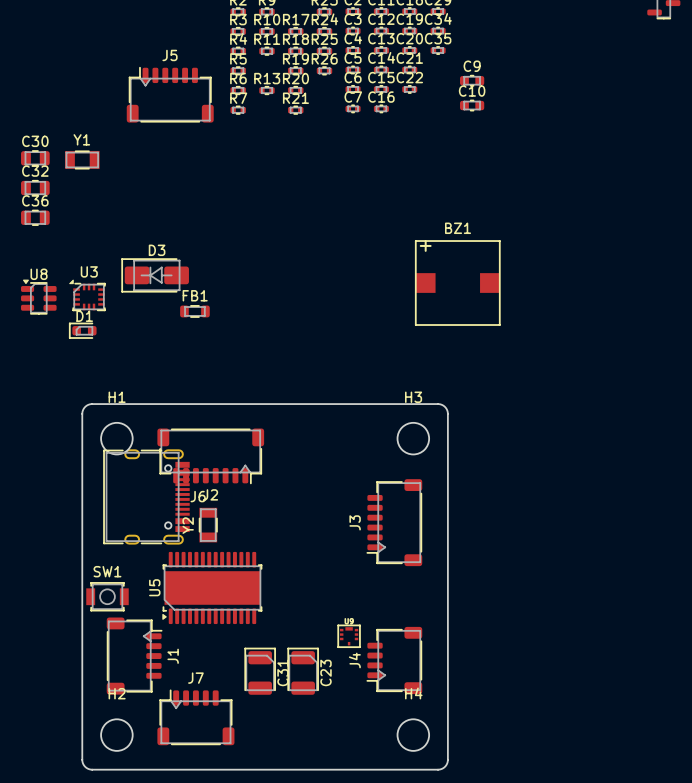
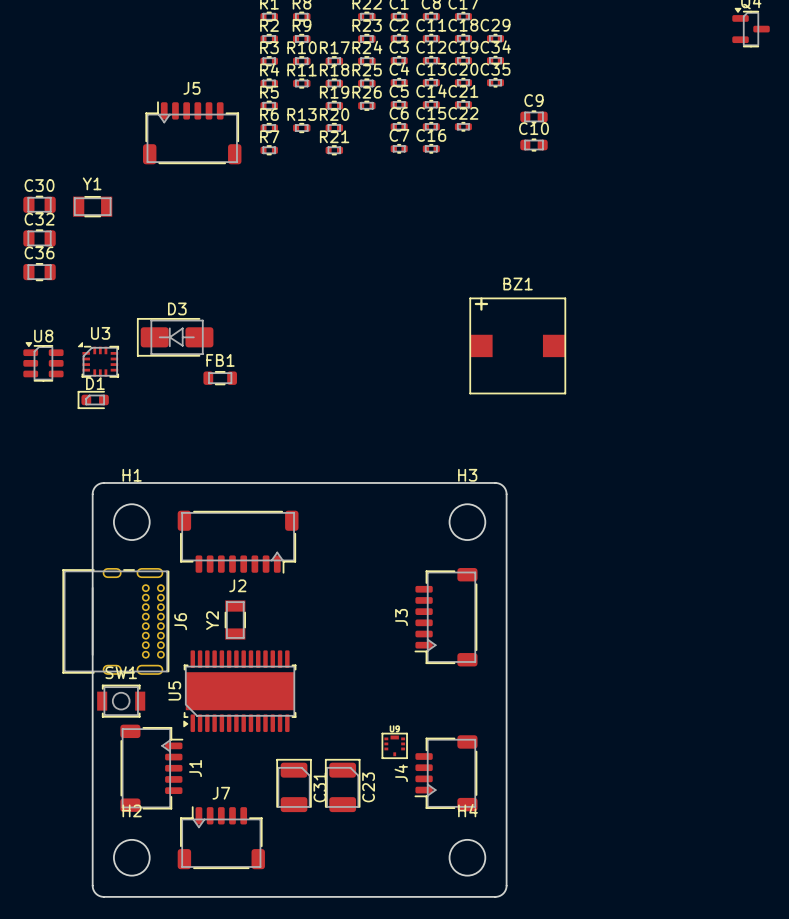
J6 footprint: [103, 449, 190, 545] -> [62, 568, 170, 675]

